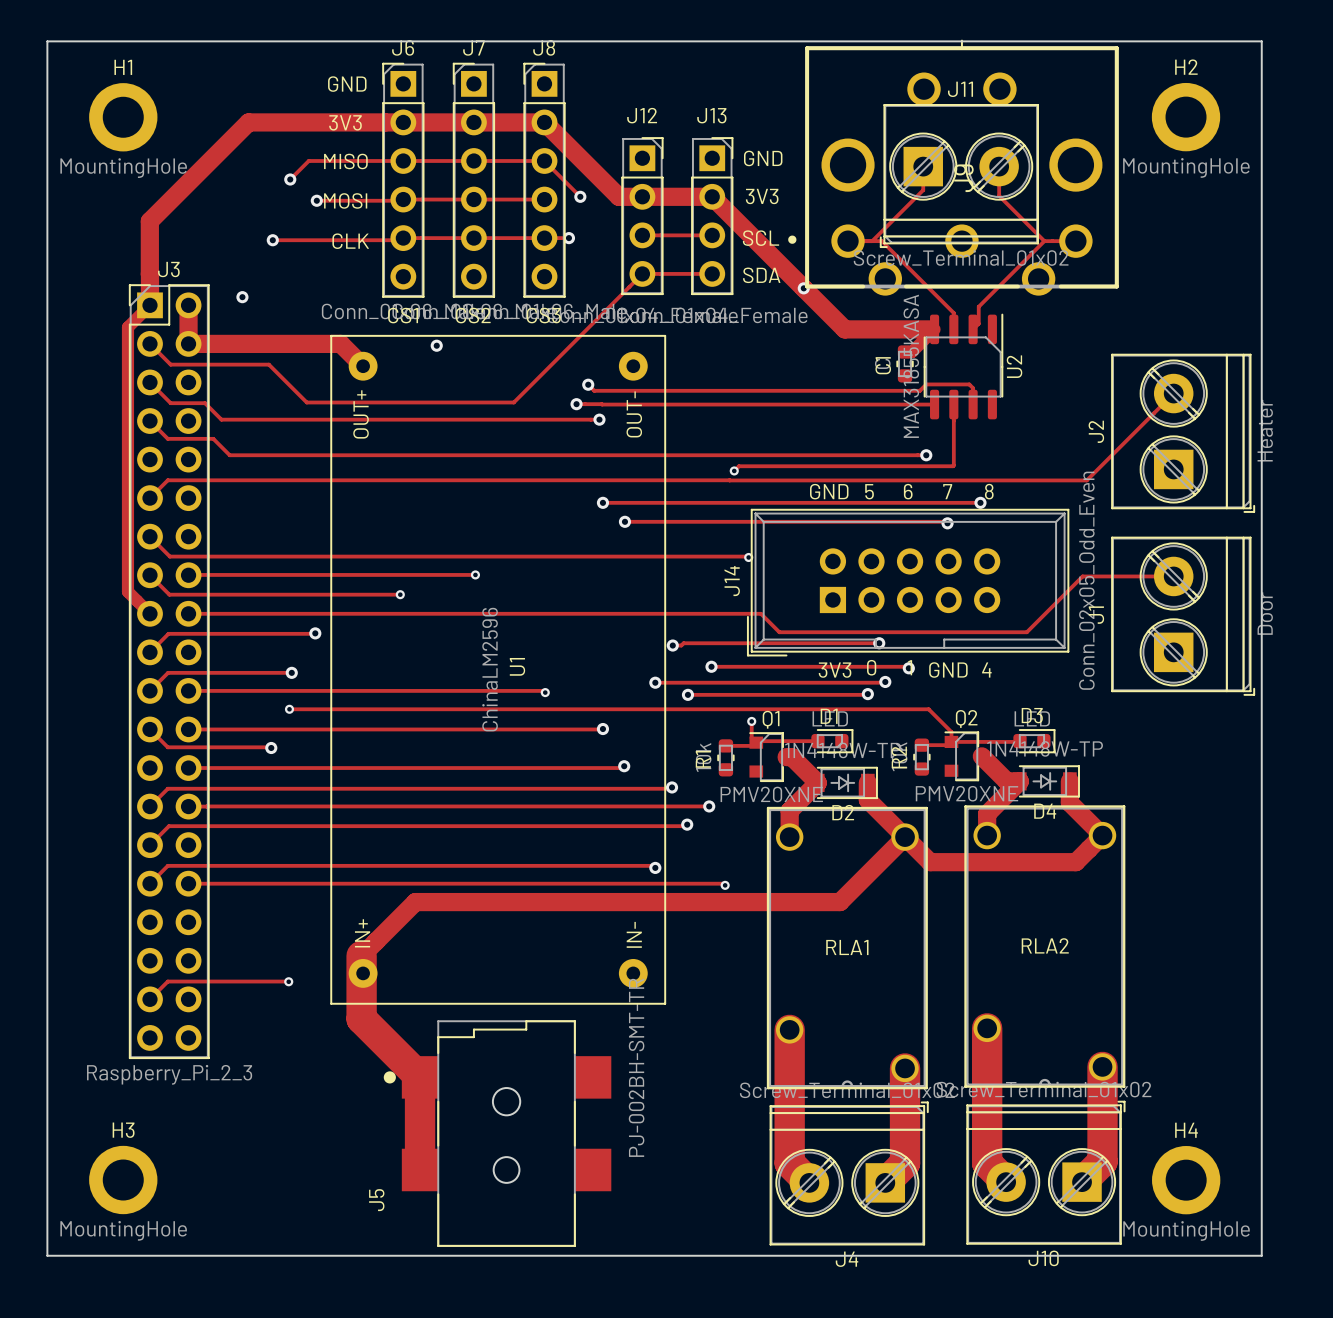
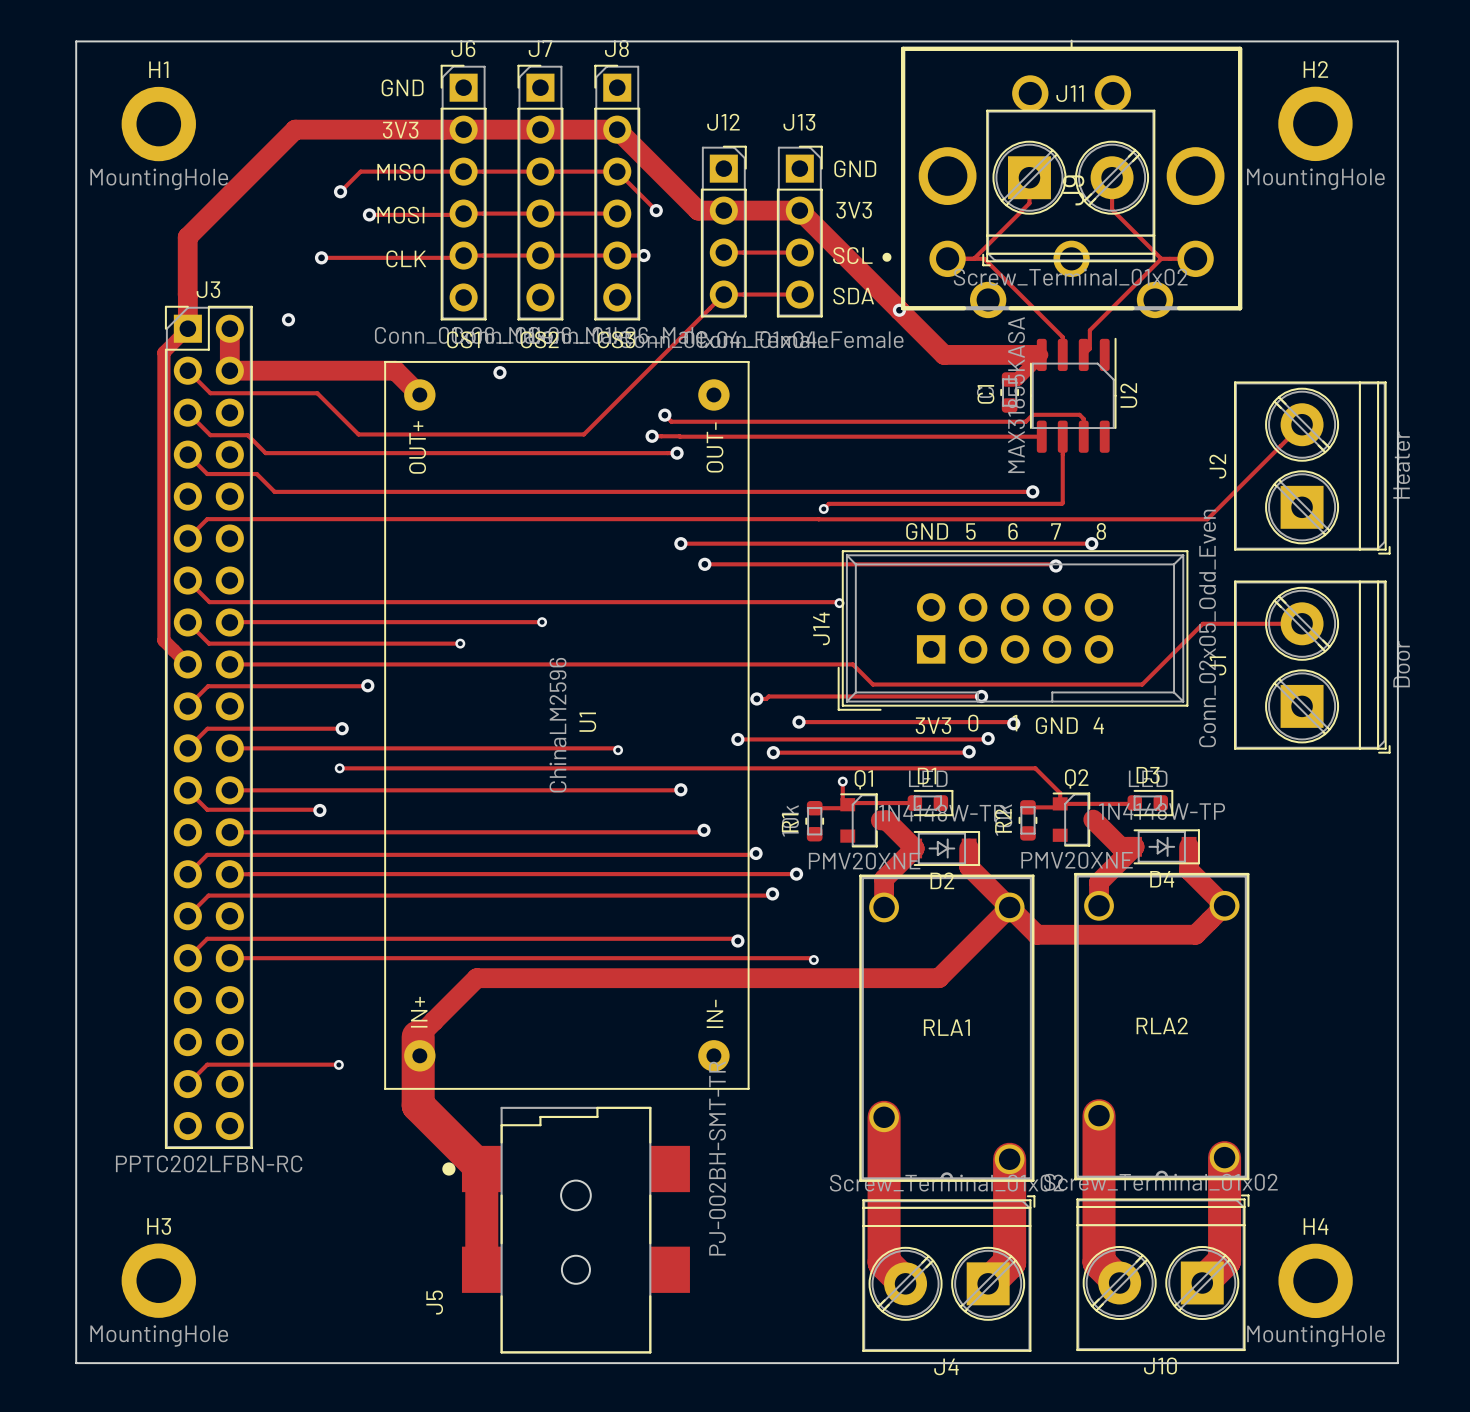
J3 value: Raspberry_Pi_2_3 (169, 1074) -> PPTC202LFBN-RC (209, 1163)

